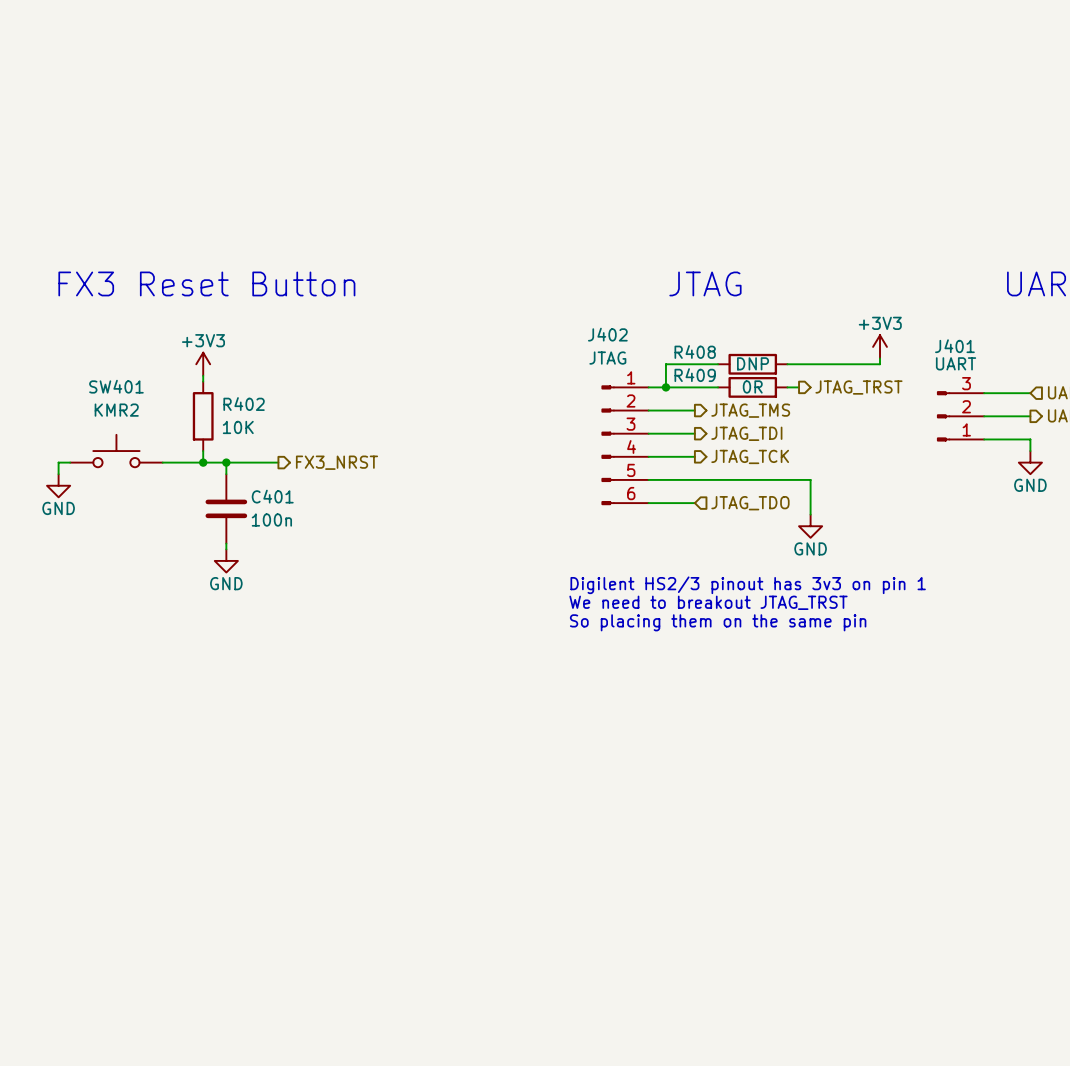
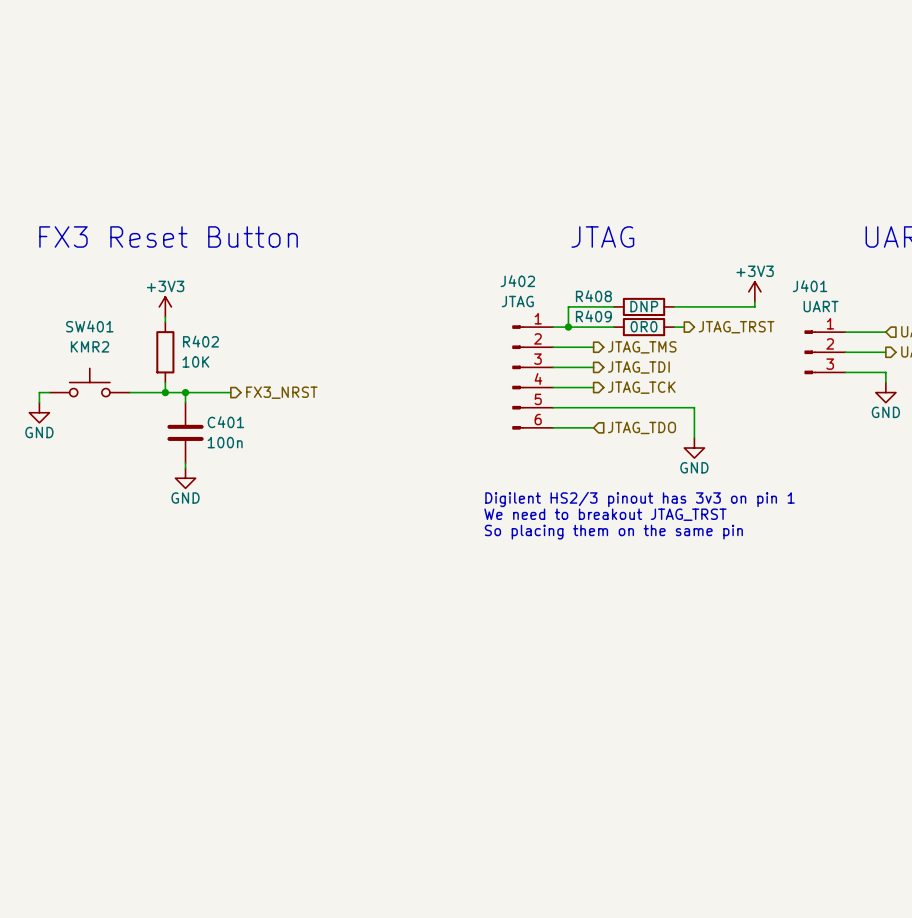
R409 value: 0R (752, 386) -> 0R0 (644, 326)
J401 flip: as is (943, 416) -> up-down (810, 352)

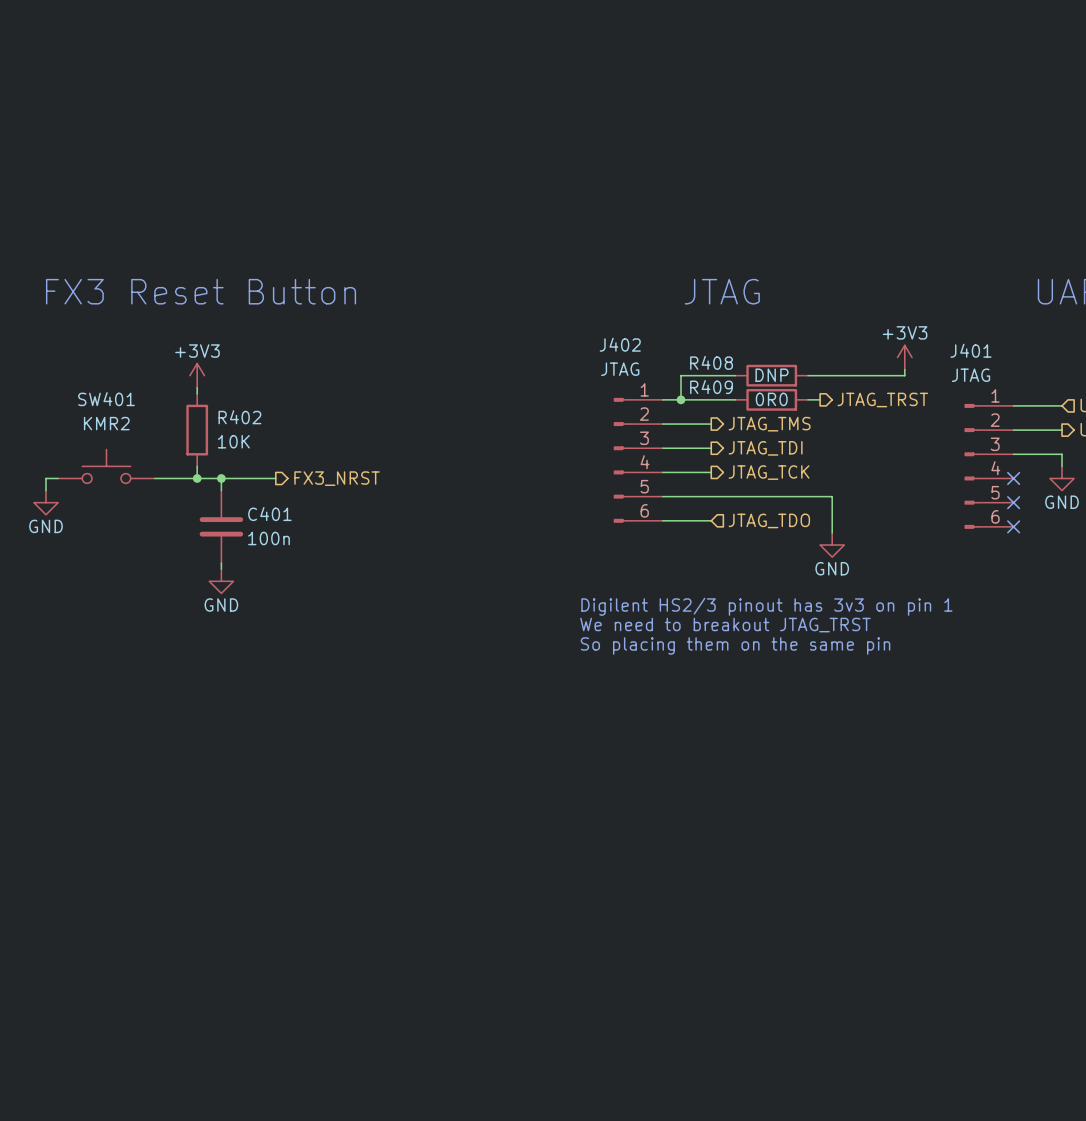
J401 value: UART (821, 306) -> JTAG (971, 375)
J401 symbol: [804, 330, 846, 375] -> [964, 403, 1014, 529]
no-connect mark: none -> (1013, 478)
no-connect mark: none -> (1013, 502)
no-connect mark: none -> (1013, 526)

